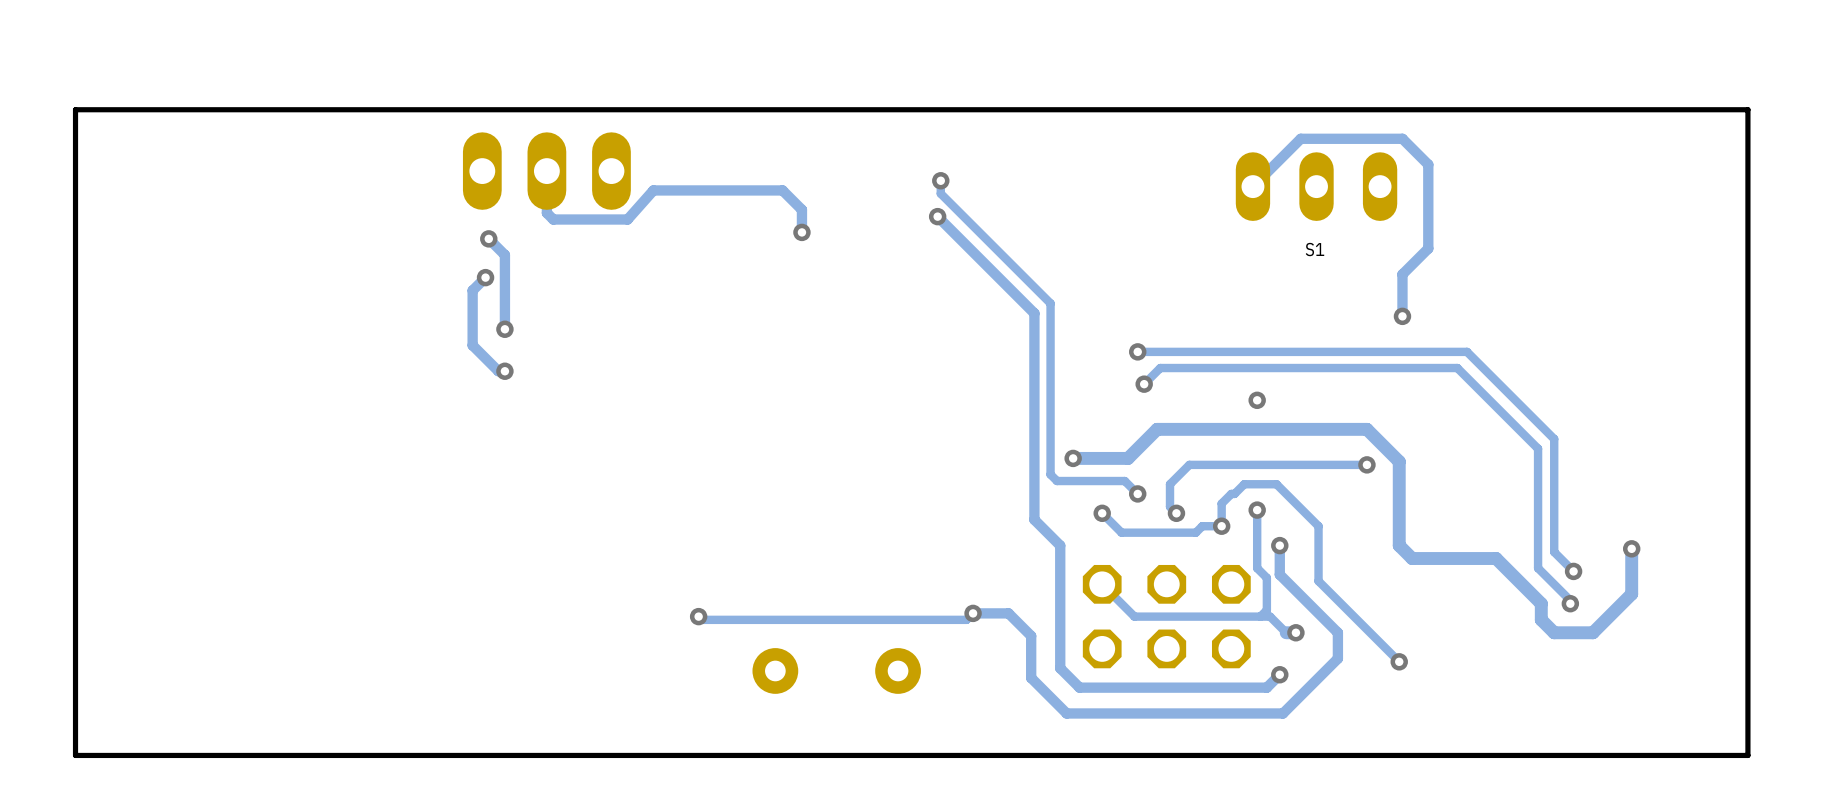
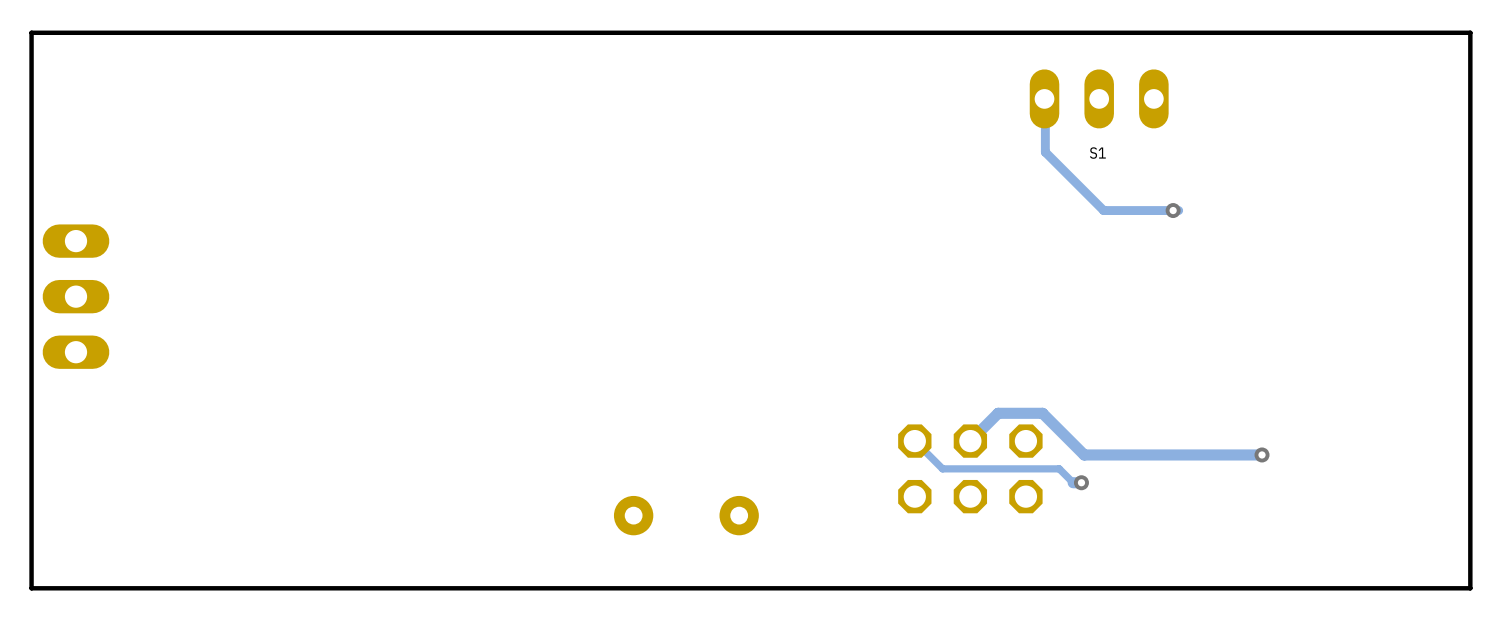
track: (546, 171) (546, 213) (553, 219) (627, 219) (653, 190) (782, 190) (801, 209) (801, 232) -> none
part rotation: 0° (546, 171) -> 90° clockwise (75, 296)
part position: (546, 171) -> (75, 296)
track: (940, 180) (940, 193) (1050, 303) (1050, 474) (1057, 481) (1124, 481) (1137, 493) -> none
via: (940, 180) -> none
track: (1252, 186) (1300, 138) (1402, 138) (1428, 164) (1428, 248) (1402, 274) (1402, 316) -> (1044, 98) (1045, 152) (1103, 210) (1178, 210)
track: (937, 216) (1034, 313) (1034, 519) (1060, 545) (1060, 668) (1079, 687) (1266, 687) (1279, 674) -> none
via: (937, 216) -> none
via: (801, 232) -> none
track: (488, 238) (504, 255) (504, 329) -> none
via: (488, 238) -> none
track: (485, 277) (472, 290) (472, 345) (498, 371) (504, 371) -> none
via: (485, 277) -> none
via: (504, 329) -> none
track: (1137, 351) (1467, 351) (1554, 439) (1554, 552) (1573, 571) -> none
via: (1137, 351) -> none
via: (504, 371) -> none
track: (1144, 384) (1160, 368) (1457, 368) (1538, 448) (1538, 568) (1570, 600) (1570, 603) -> none
via: (1144, 384) -> none
via: (1257, 400) -> none
track: (1073, 458) (1128, 458) (1157, 429) (1366, 429) (1399, 461) (1399, 545) (1412, 558) (1496, 558) (1541, 603) (1541, 619) (1554, 632) (1592, 632) (1631, 594) (1631, 548) -> none
via: (1073, 458) -> none
track: (1366, 464) (1189, 464) (1170, 484) (1170, 506) (1176, 513) -> none
via: (1366, 464) -> none
via: (1137, 493) -> none
track: (1257, 510) (1257, 568) (1266, 577) (1266, 610) (1260, 616) -> none
via: (1257, 510) -> none
track: (1102, 513) (1121, 532) (1195, 532) (1202, 526) (1221, 526) (1221, 503) (1244, 484) (1276, 484) (1318, 526) (1318, 581) (1399, 661) -> none
via: (1102, 513) -> none
via: (1176, 513) -> none
via: (1221, 526) -> none
track: (1279, 545) (1279, 574) (1337, 632) (1337, 658) (1283, 713) (1066, 713) (1031, 677) (1031, 635) (1008, 613) (973, 613) (966, 619) (701, 619) (698, 616) -> none
via: (1279, 545) -> none
via: (1631, 548) -> none
via: (1573, 571) -> none
track: none -> (970, 441) (998, 413) (1042, 413) (1084, 454) (1262, 454)
via: none -> (1262, 454)
via: (1570, 603) -> none
via: (973, 613) -> none
via: (698, 616) -> none
via: (1399, 661) -> none
via: (1279, 674) -> none

